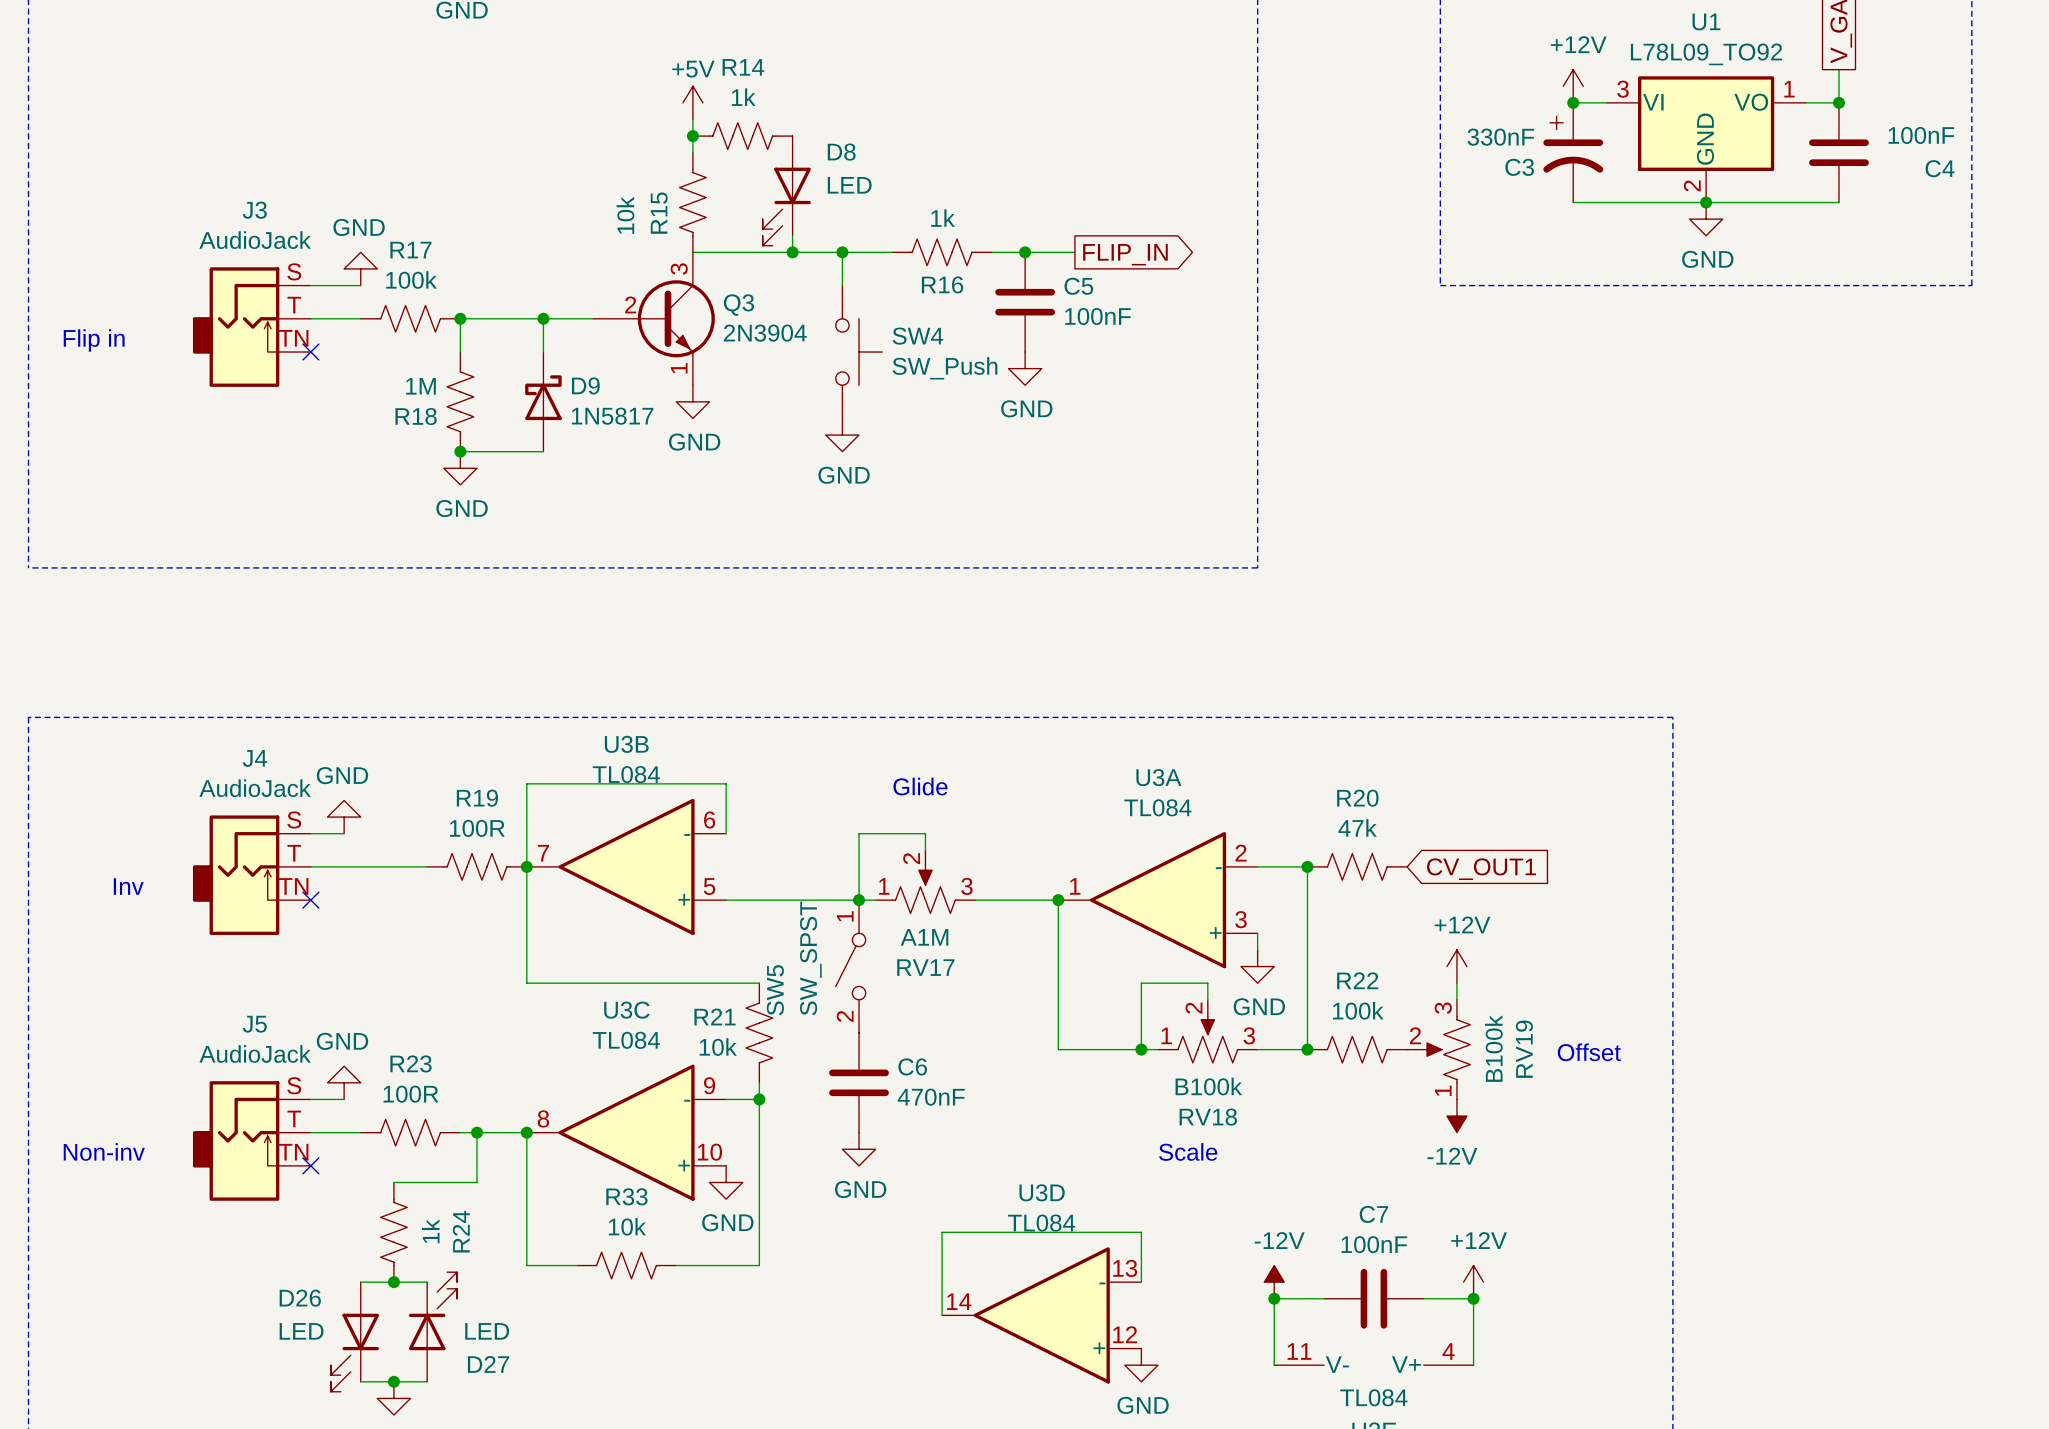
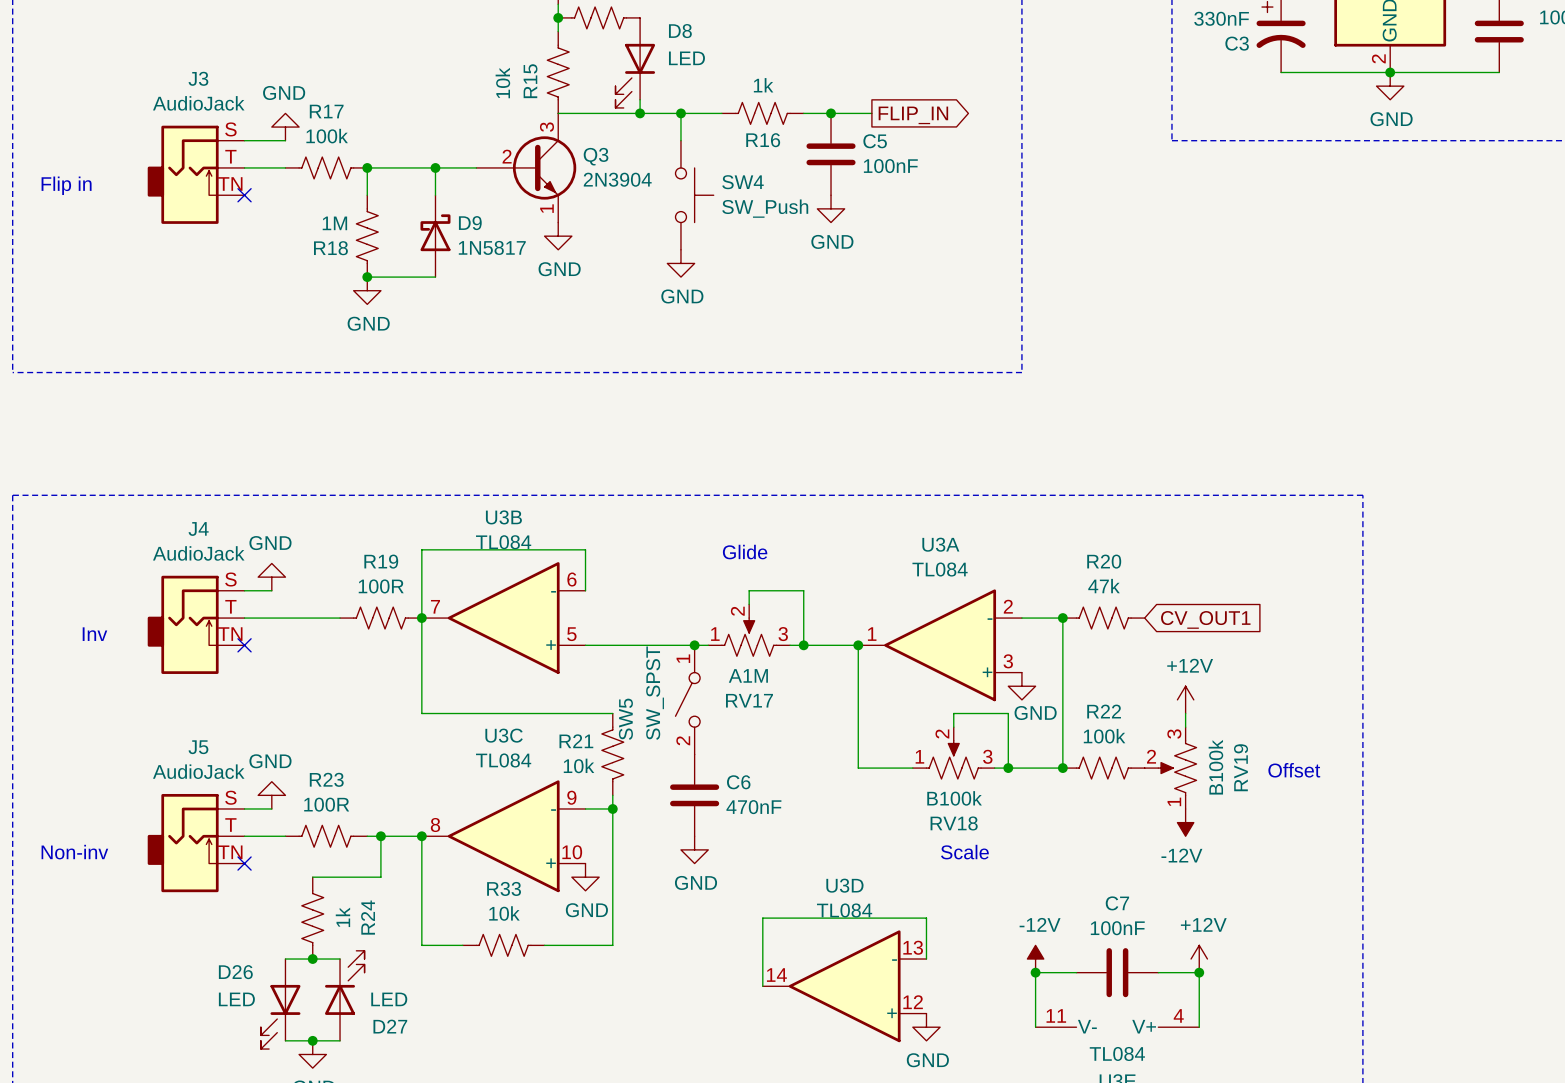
wire: (925, 833) (859, 833) (859, 900) -> (749, 590) (803, 590) (803, 645)
junction: none -> (803, 645)
power symbol position: GND (1257, 966) -> GND (1021, 686)
wire: (1174, 983) (1141, 983) (1141, 1049) -> (953, 713) (953, 727)
wire: (1207, 983) (1207, 999) -> (981, 713) (1008, 713) (1008, 768)
power symbol text position: GND (1259, 1006) -> GND (1035, 713)
RV18 position: (1207, 1031) -> (953, 753)
junction: (1141, 1049) -> none
junction: none -> (1008, 768)

